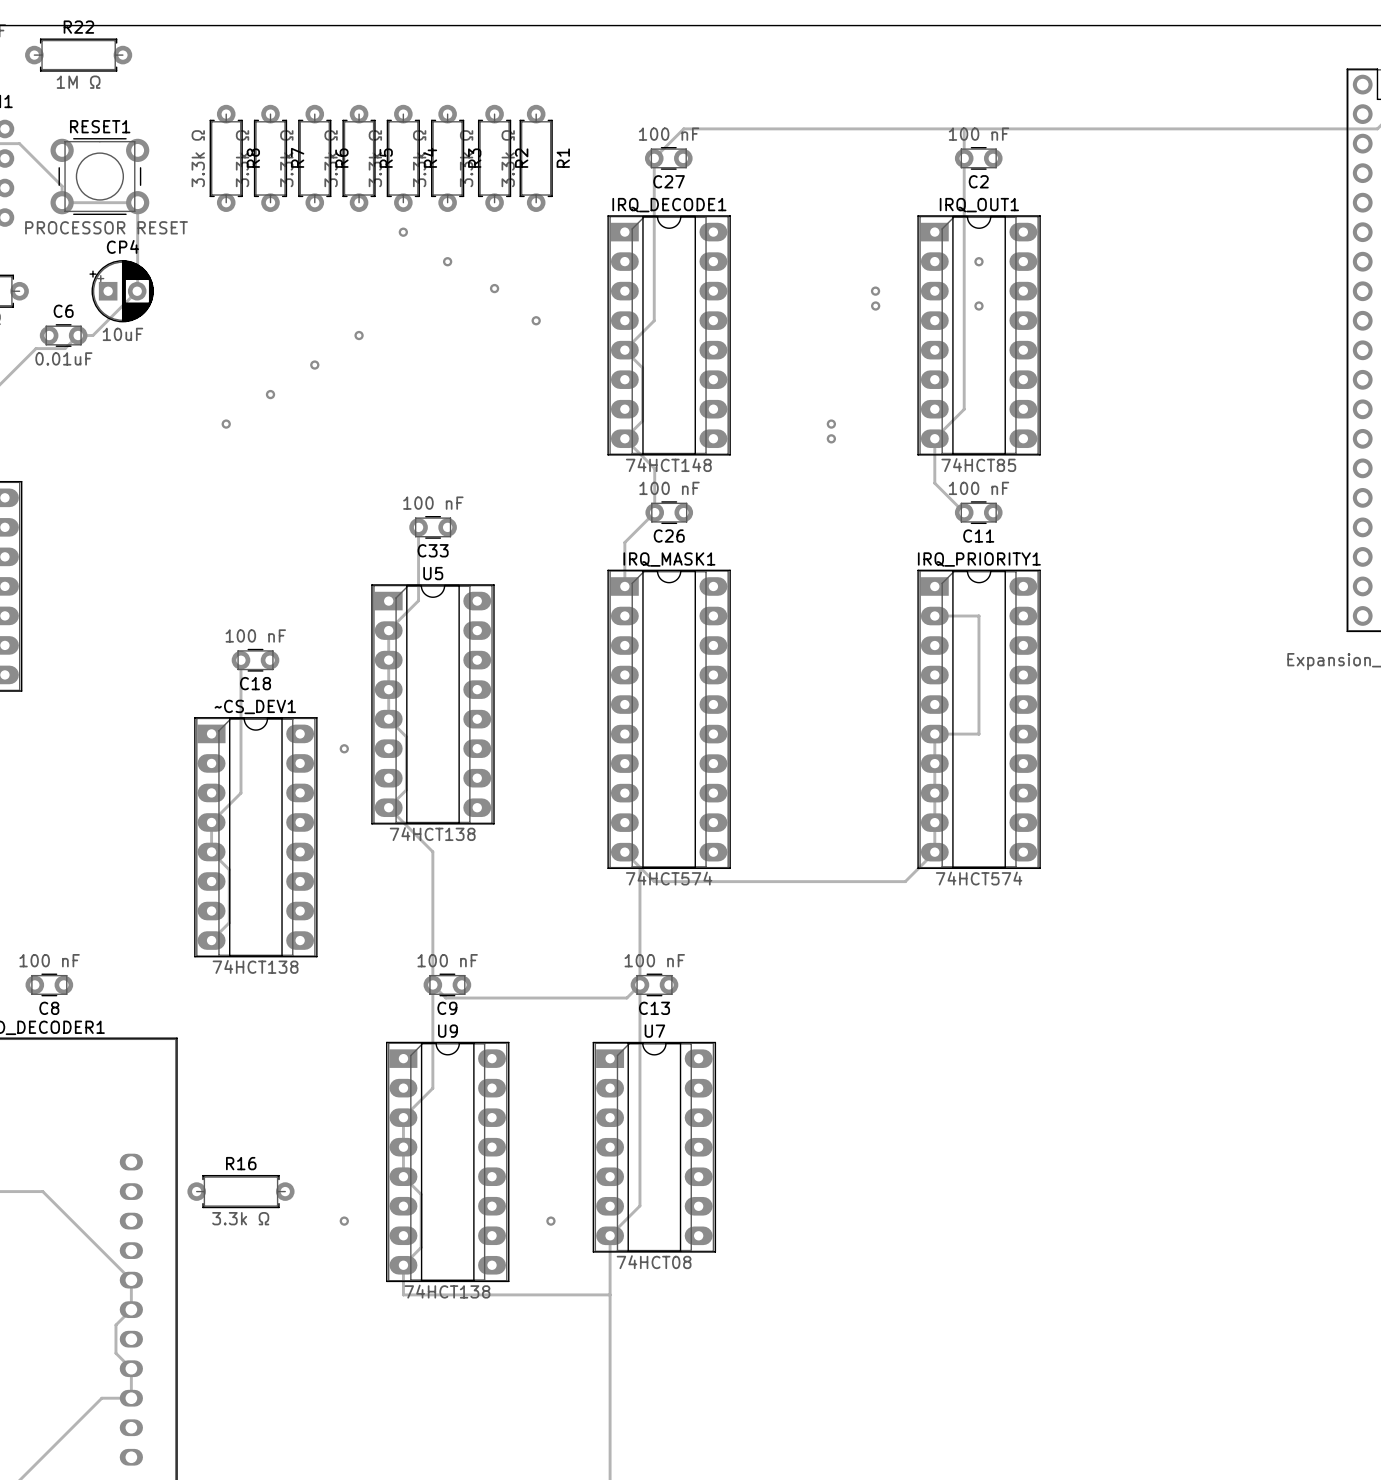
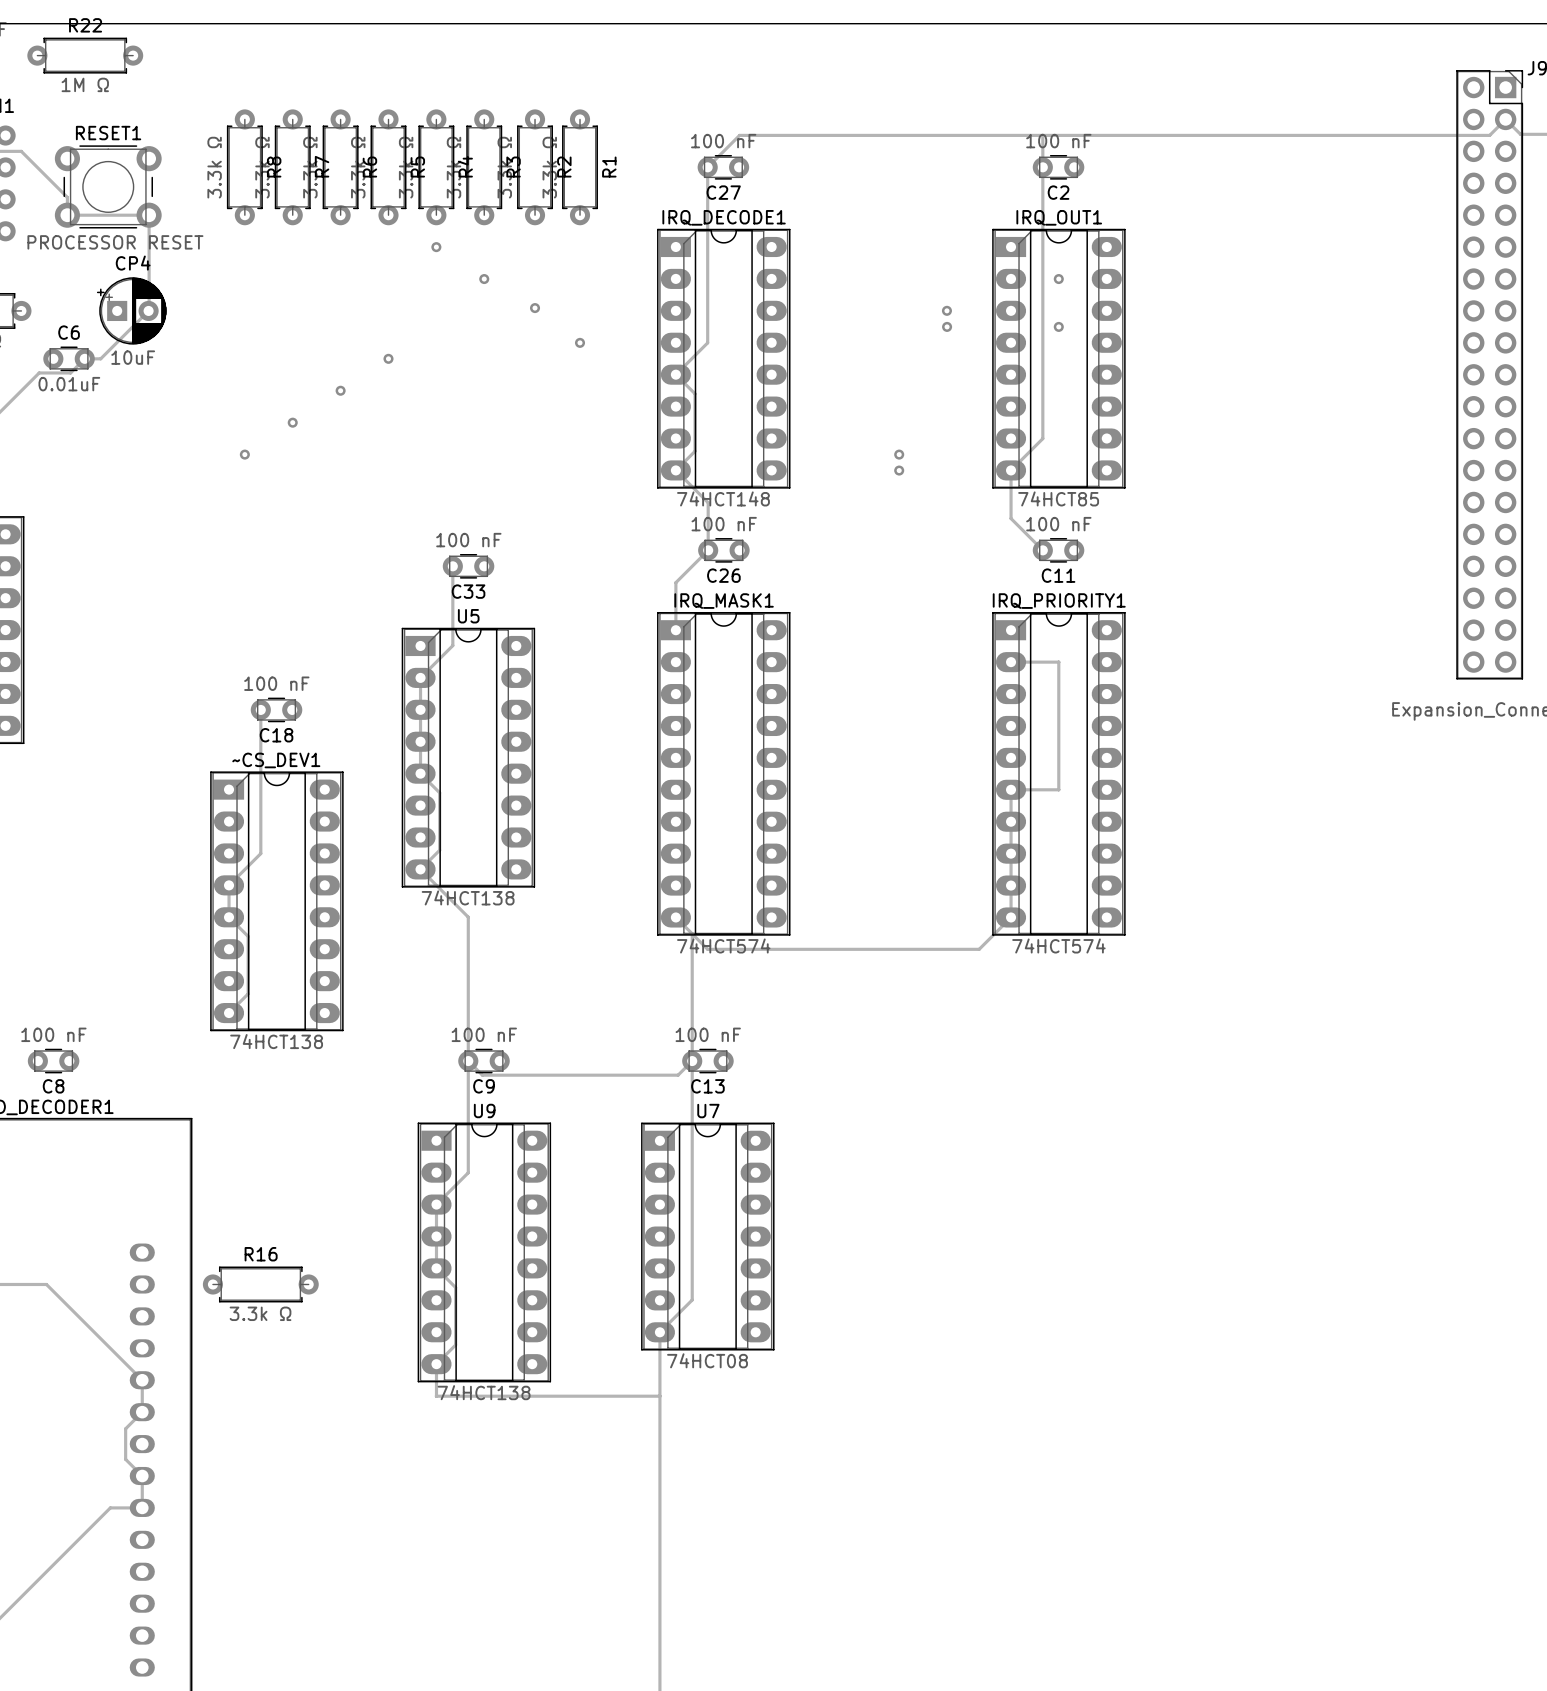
via: (344, 748) -> none
via: (344, 1221) -> none
via: (550, 1221) -> none

